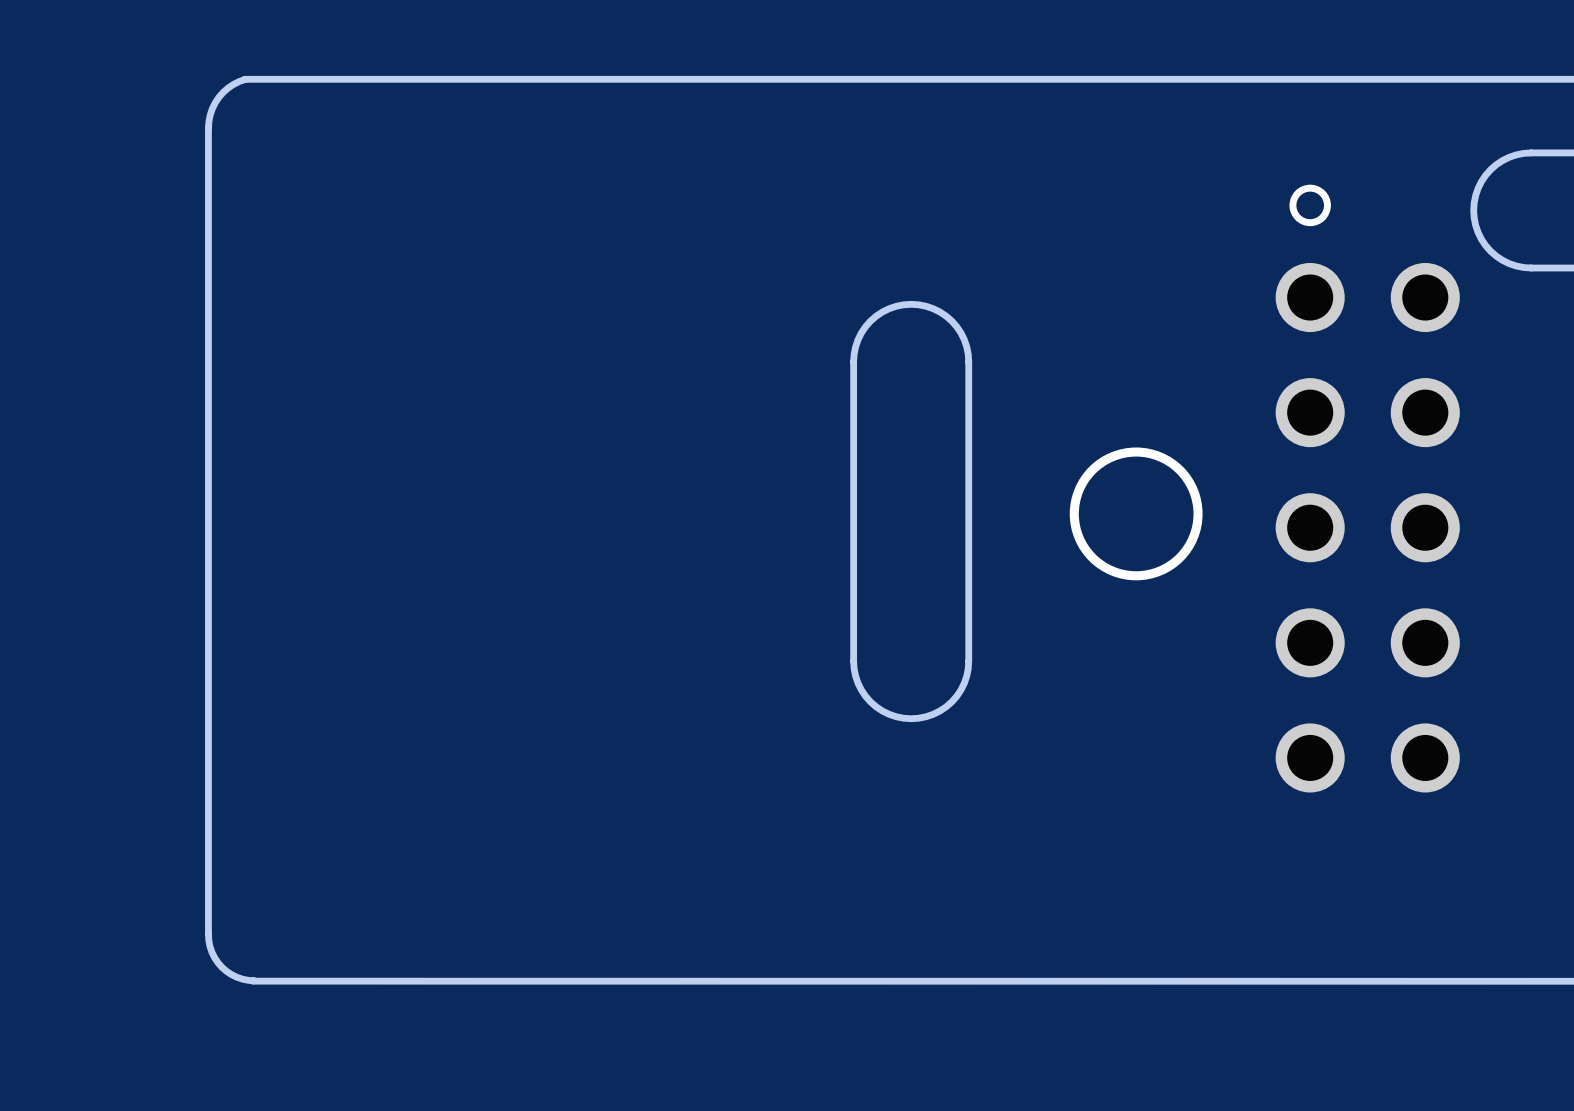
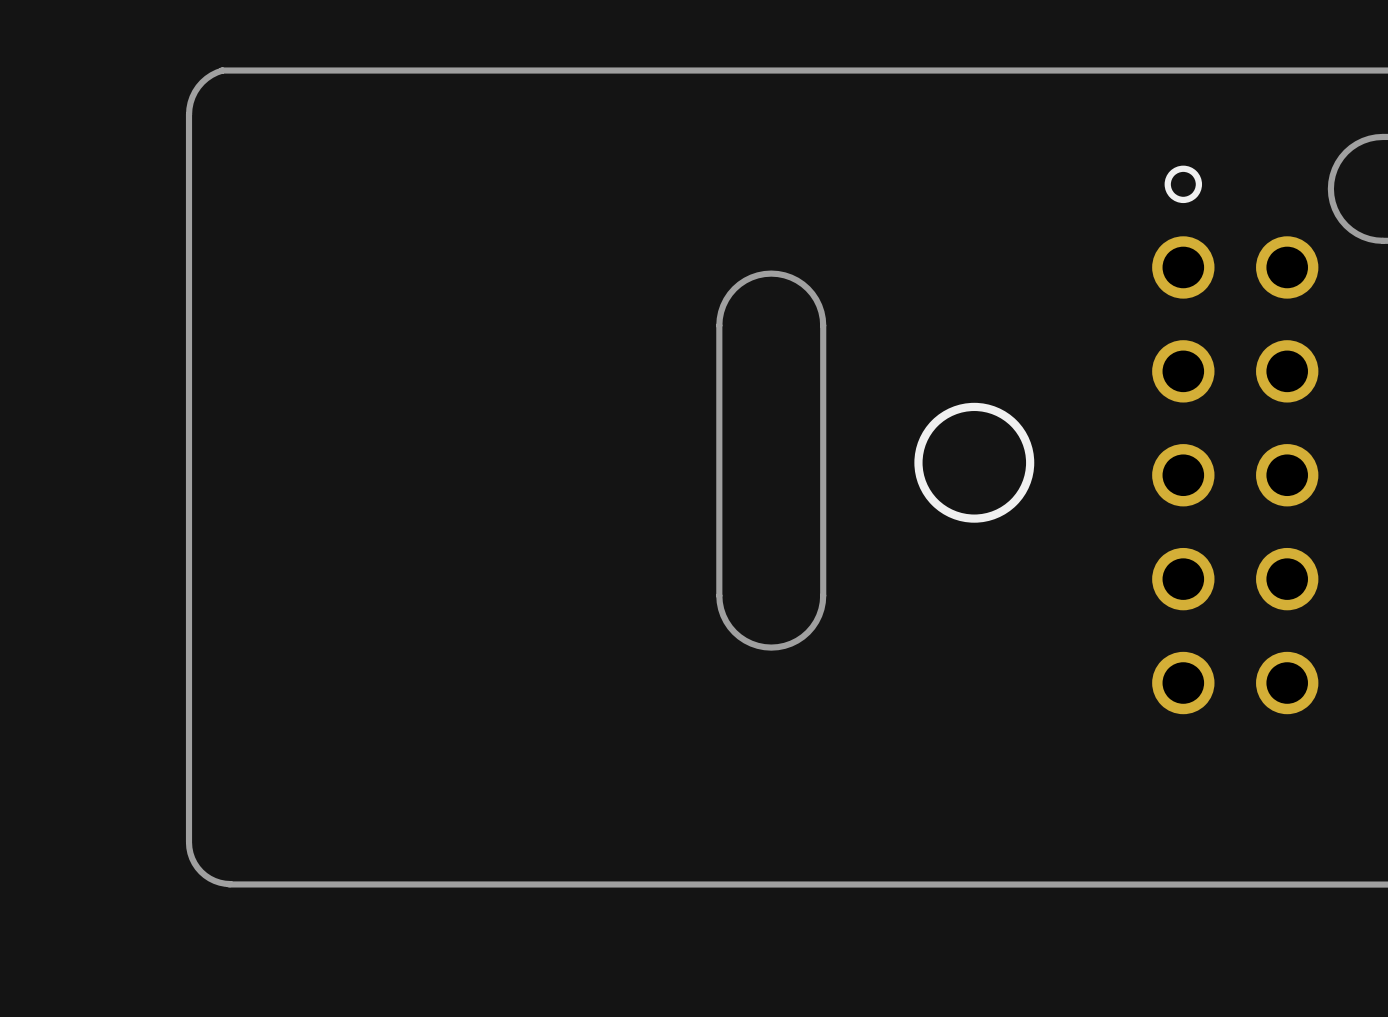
board edge: (853, 361) (854, 668) (861, 689) (876, 706) (896, 716) (918, 718) (939, 711) (951, 701) (961, 689) (968, 668) (968, 354) (961, 333) (946, 316) (926, 306) (903, 304) (882, 312) (865, 326) (855, 346) (853, 361) -> (719, 325) (719, 602) (726, 621) (739, 636) (757, 645) (778, 647) (797, 640) (808, 632) (816, 621) (822, 602) (822, 318) (816, 299) (802, 284) (784, 275) (764, 274) (745, 280) (730, 293) (723, 305) (719, 325)
drawing position: (1136, 513) -> (974, 462)

